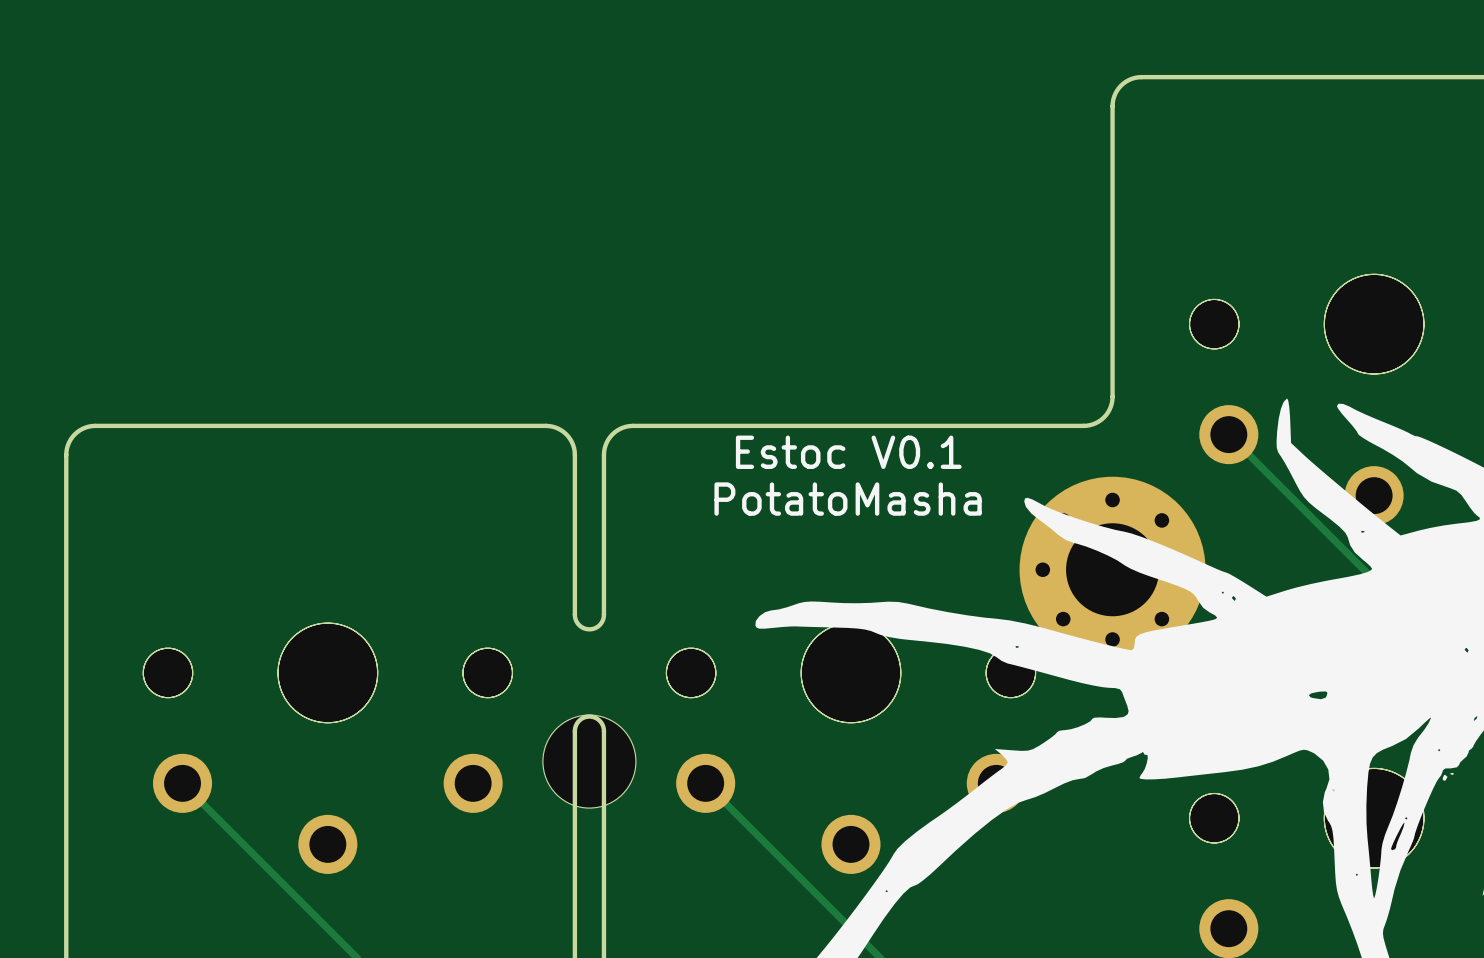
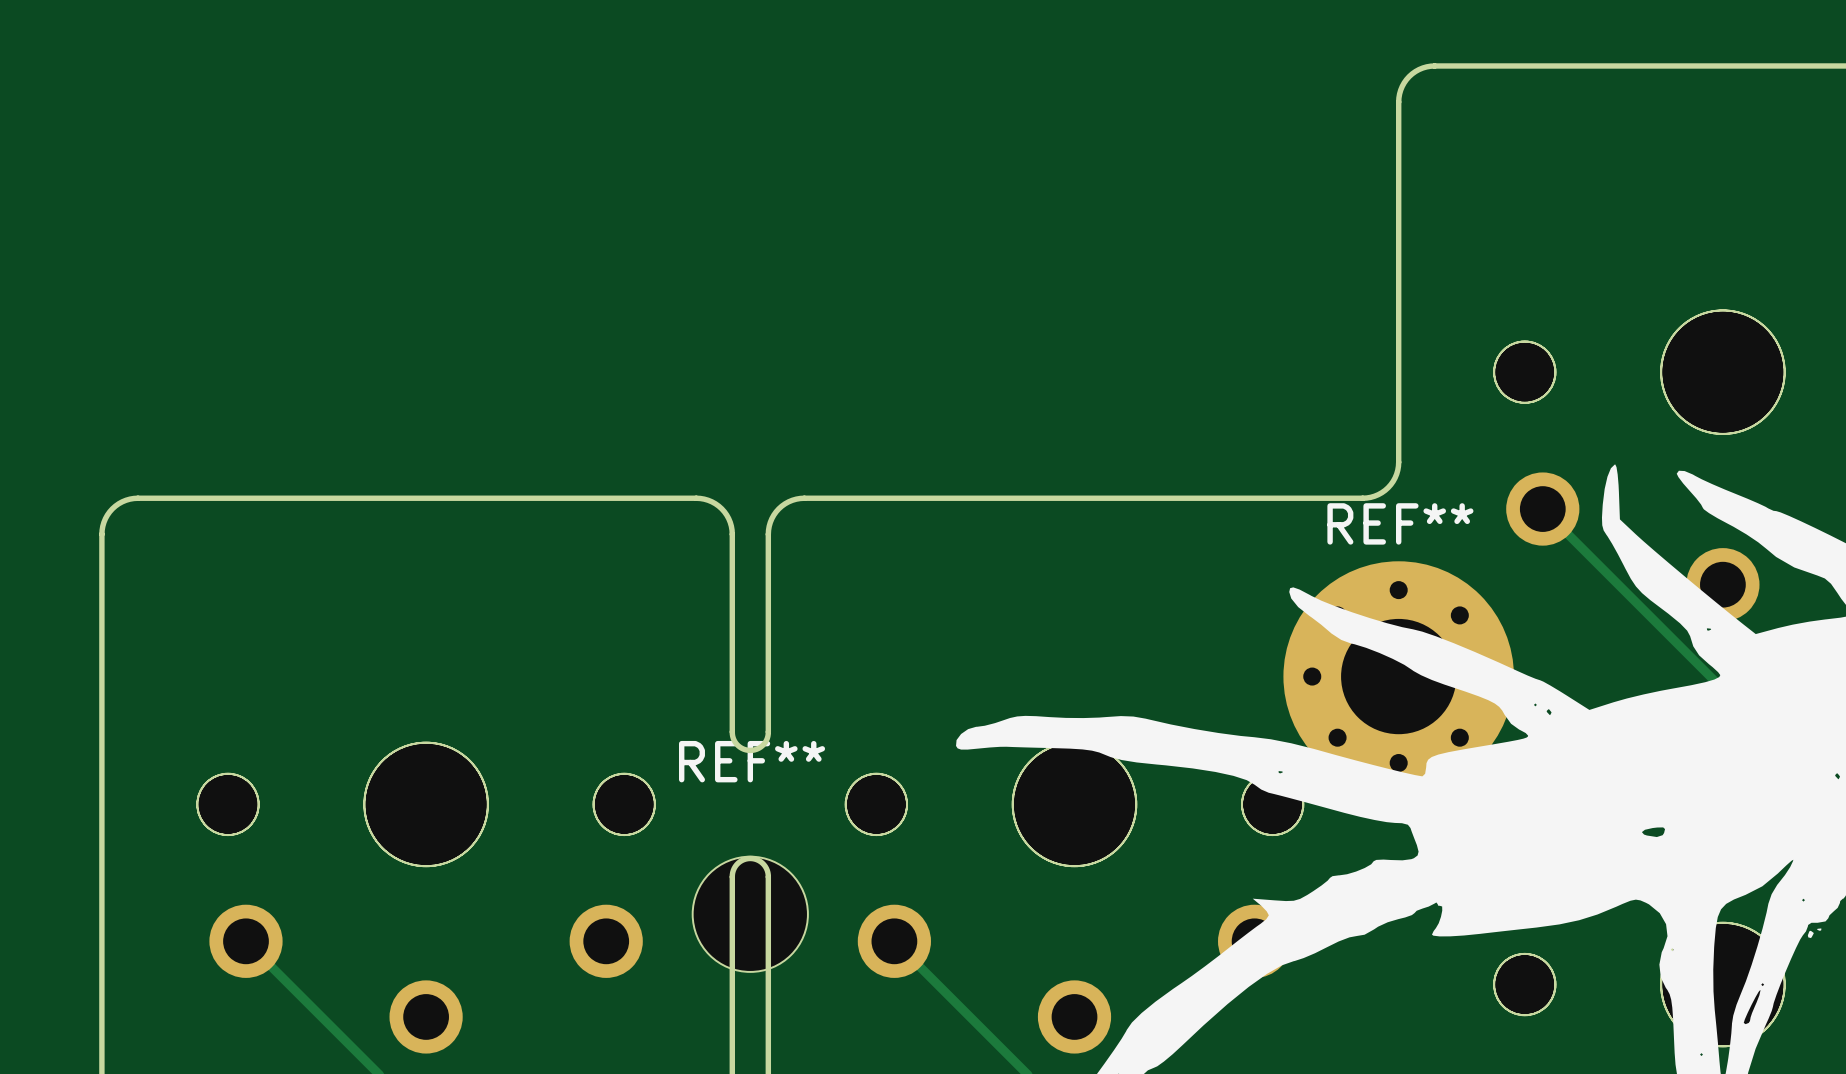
REF** name: none -> REF** (1400, 523)
text: Estoc V0.1 (848, 452) -> none
text: PotatoMasha (848, 499) -> none
REF** name: none -> REF** (752, 761)

